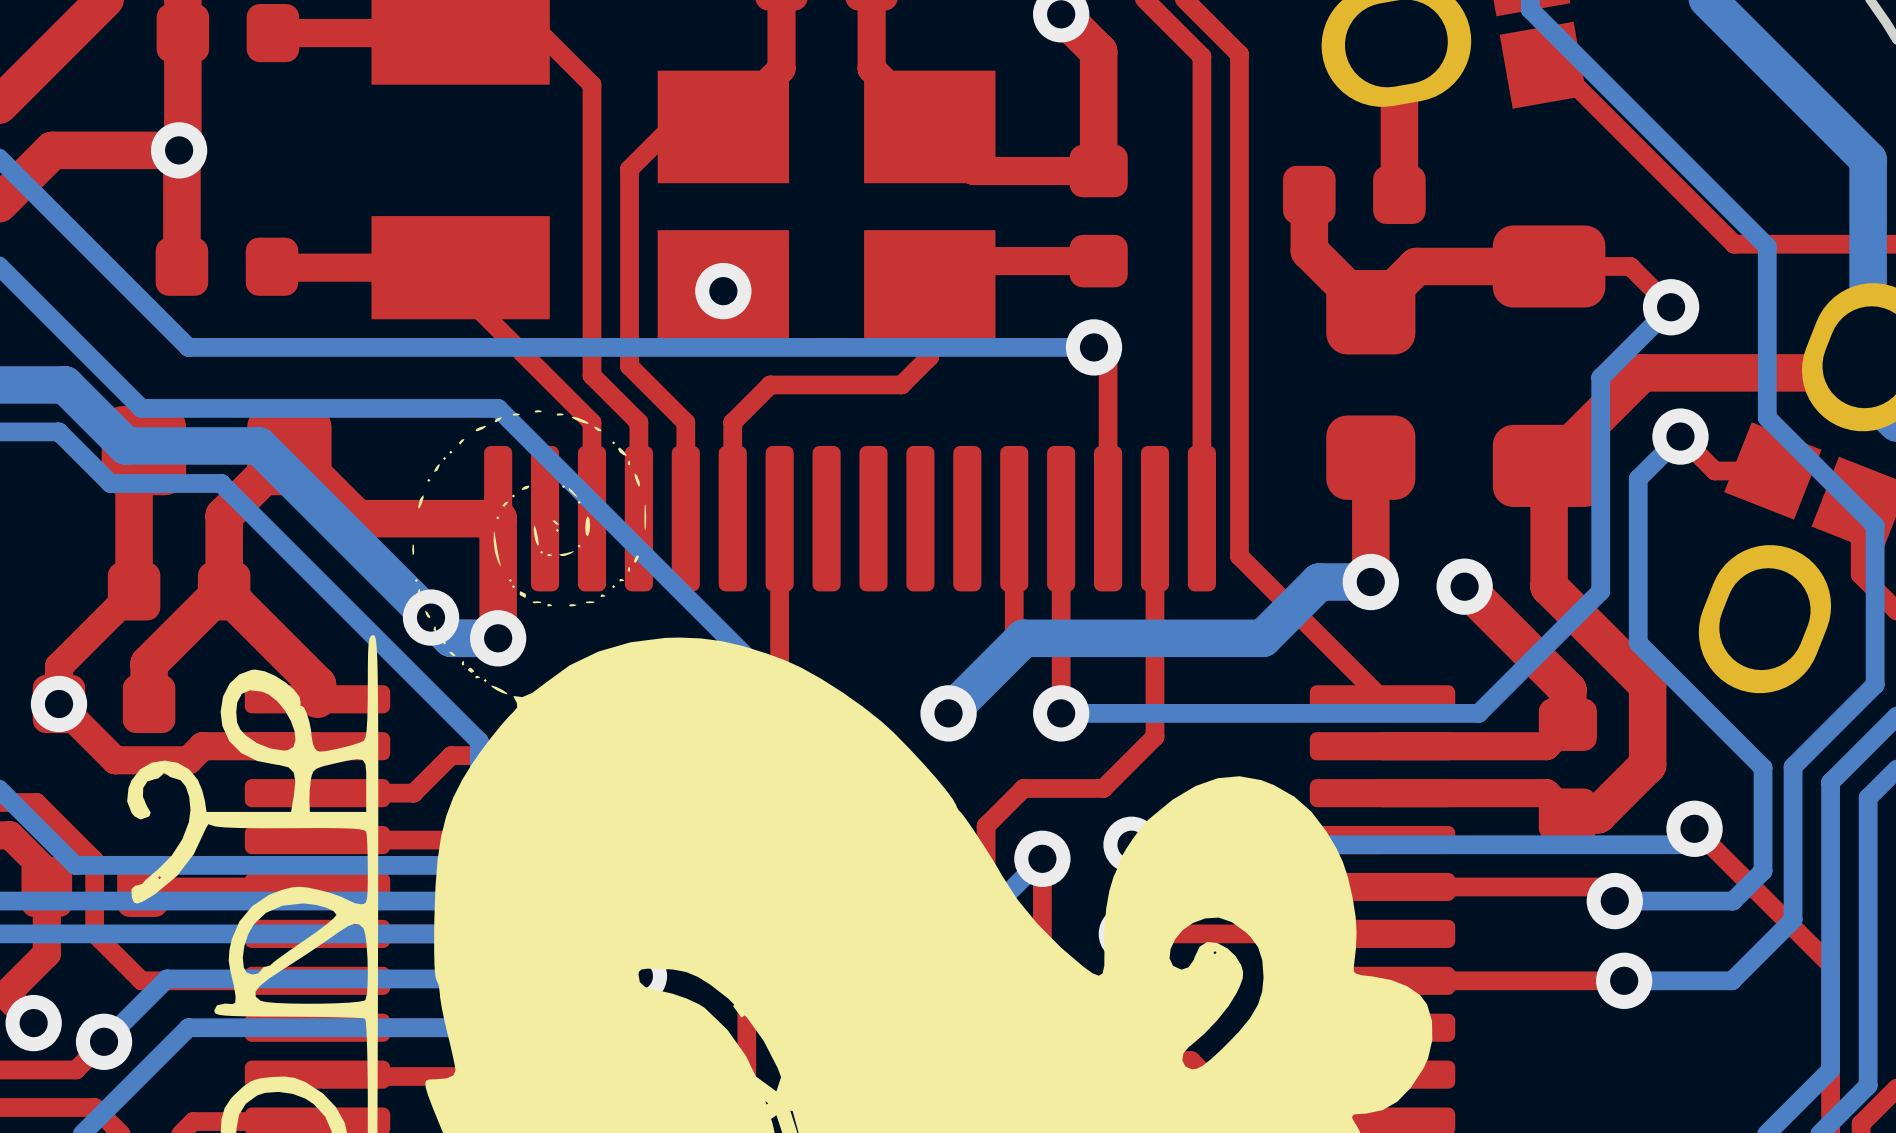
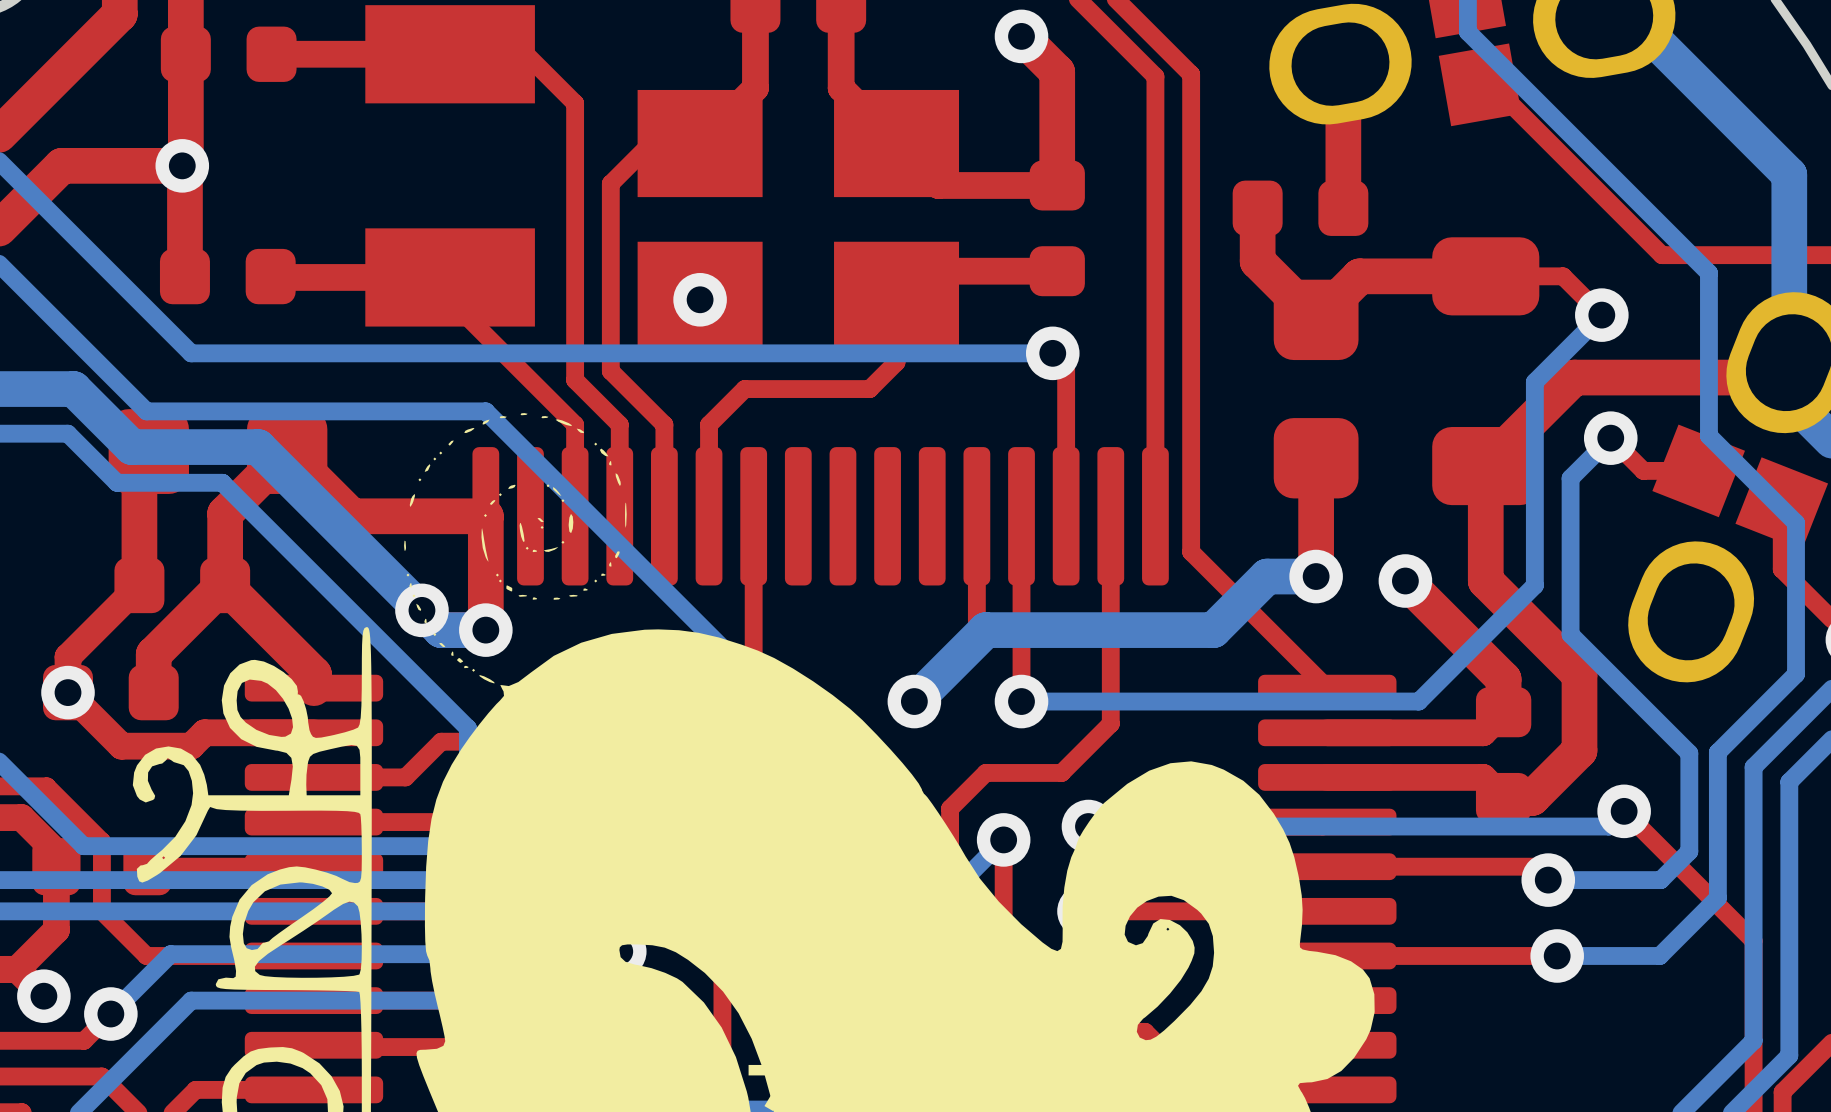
bottom track: (1767, 246) (1767, 417) (1783, 434) -> (1693, 257) (1708, 272) (1708, 435)

